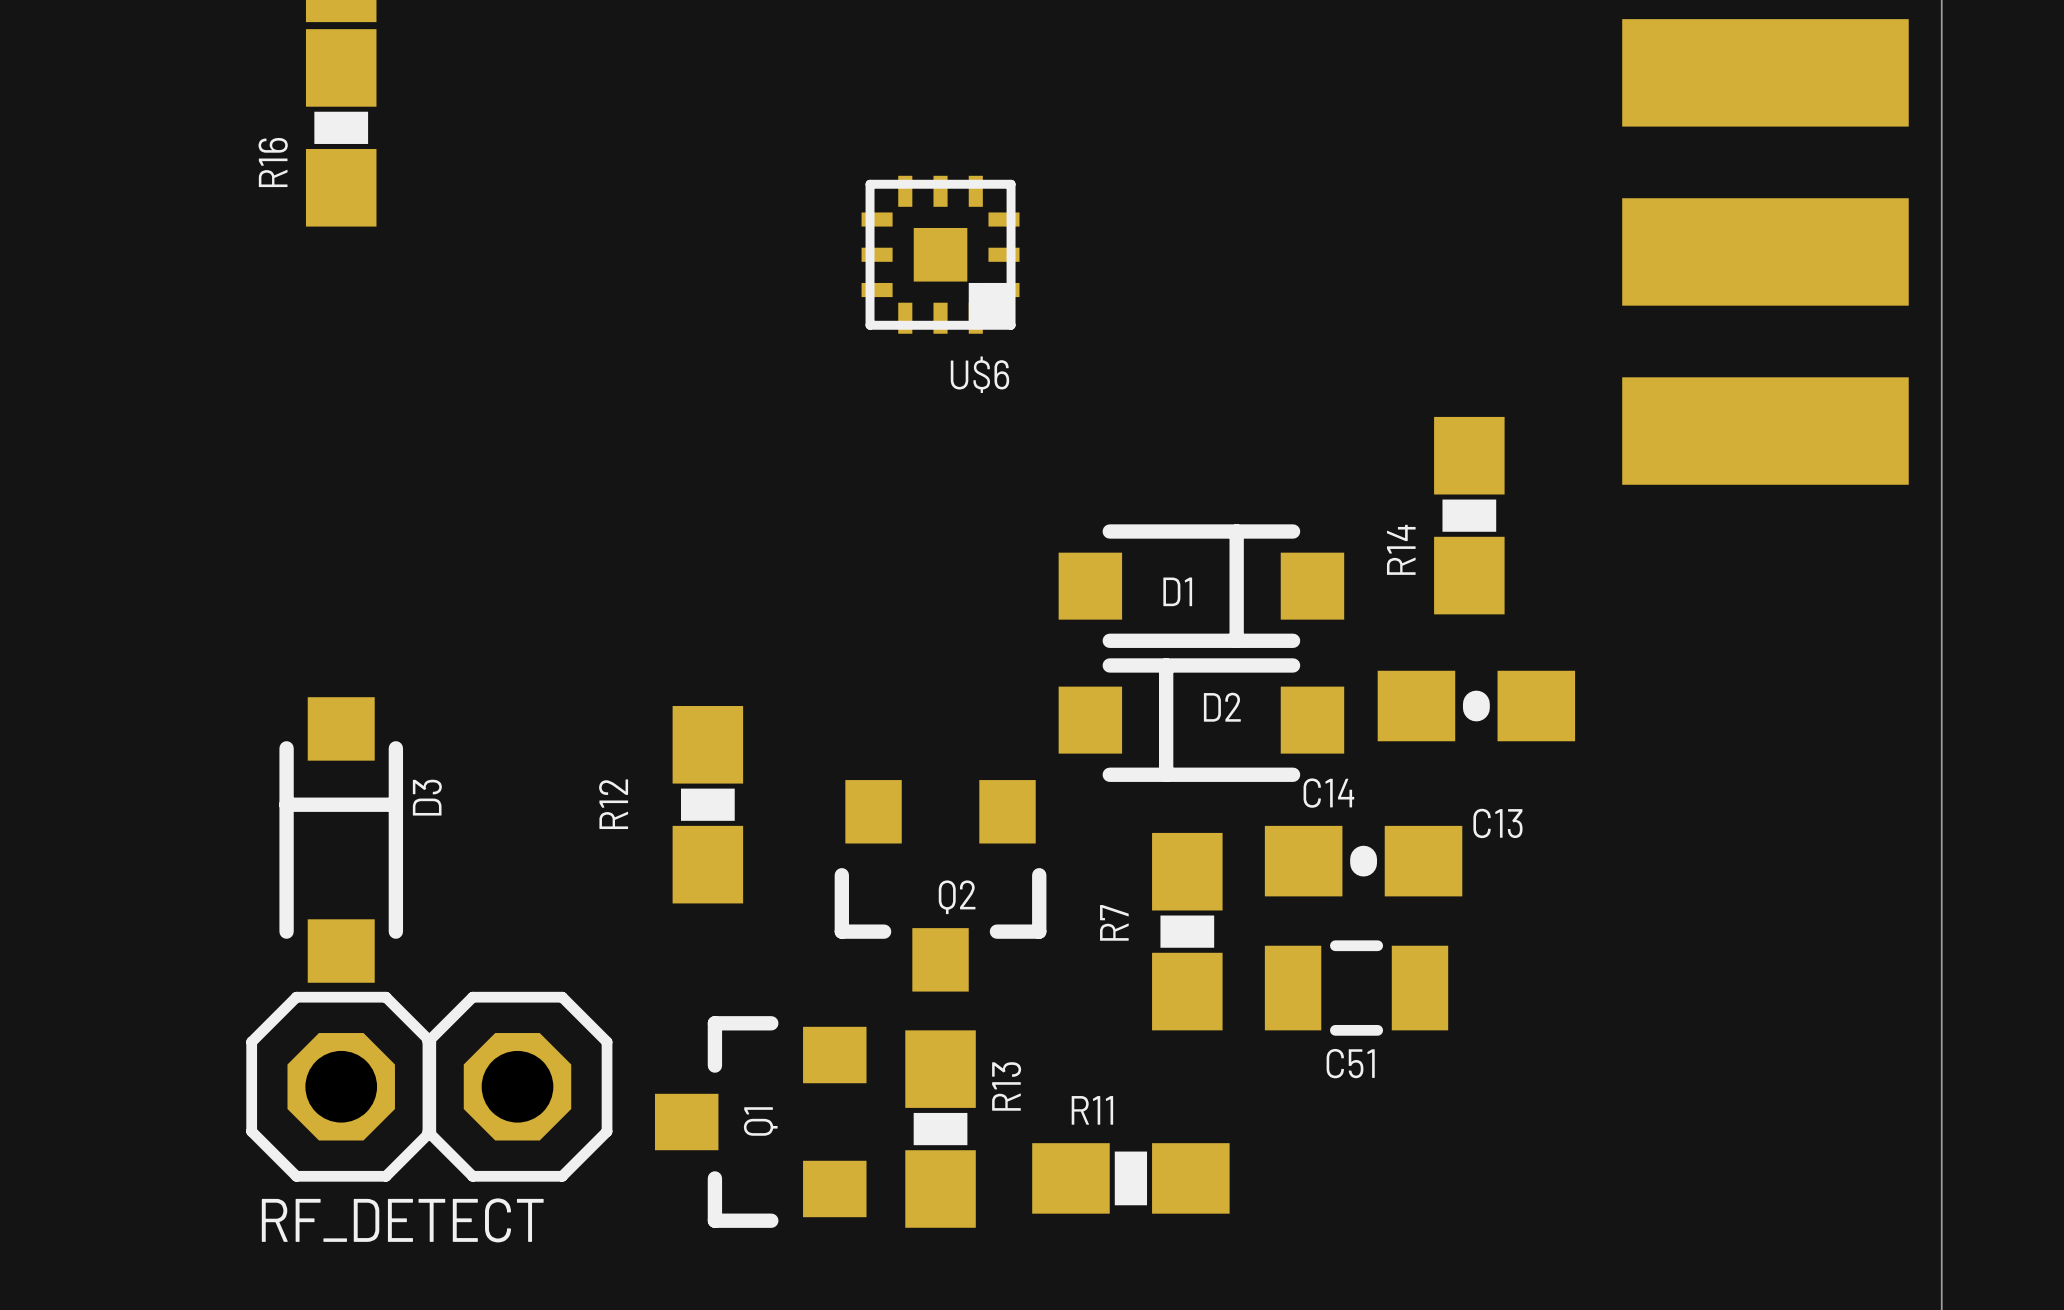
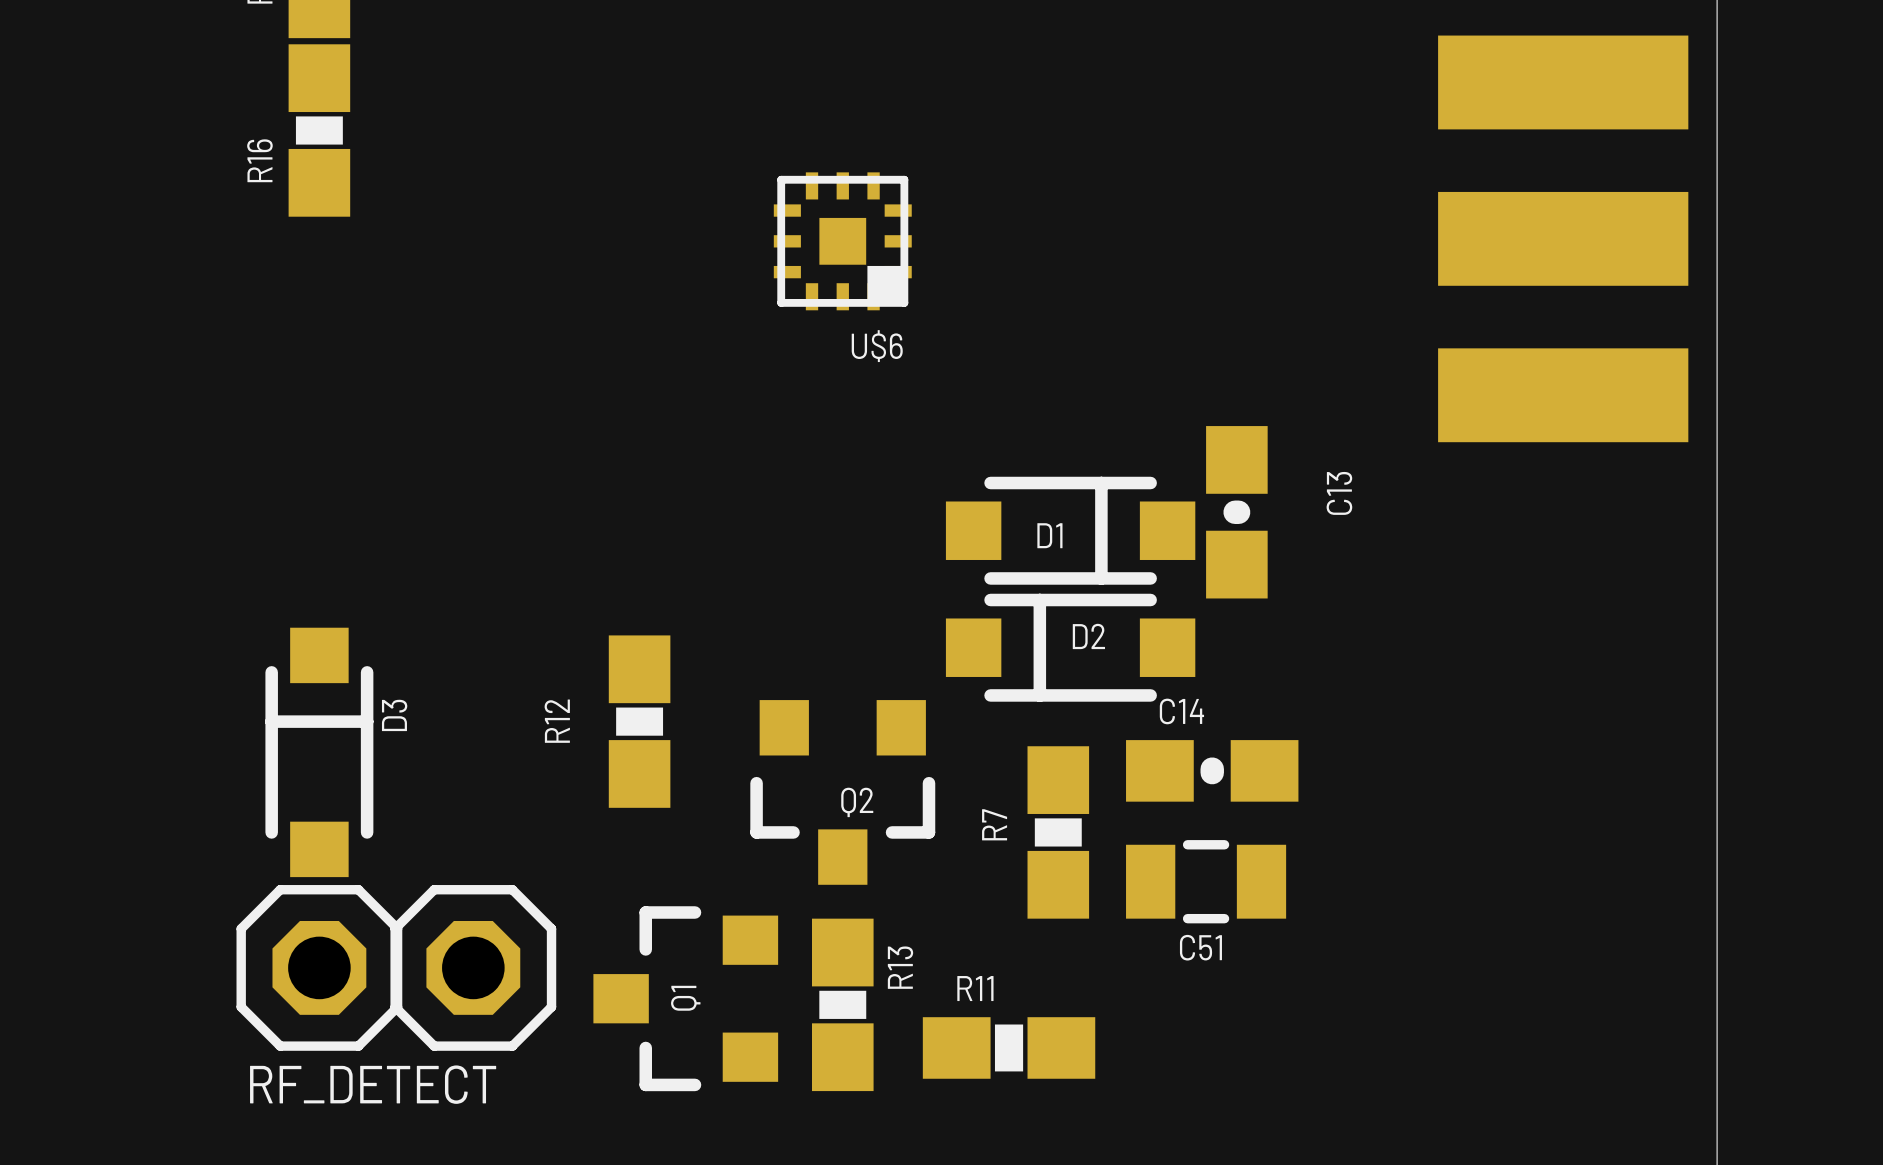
R14: (1469, 515) -> none
C13 rotation: 0° (1476, 706) -> 90° clockwise (1236, 512)
C13 position: (1476, 706) -> (1236, 512)
C13 name position: C13 (1497, 823) -> C13 (1339, 493)

